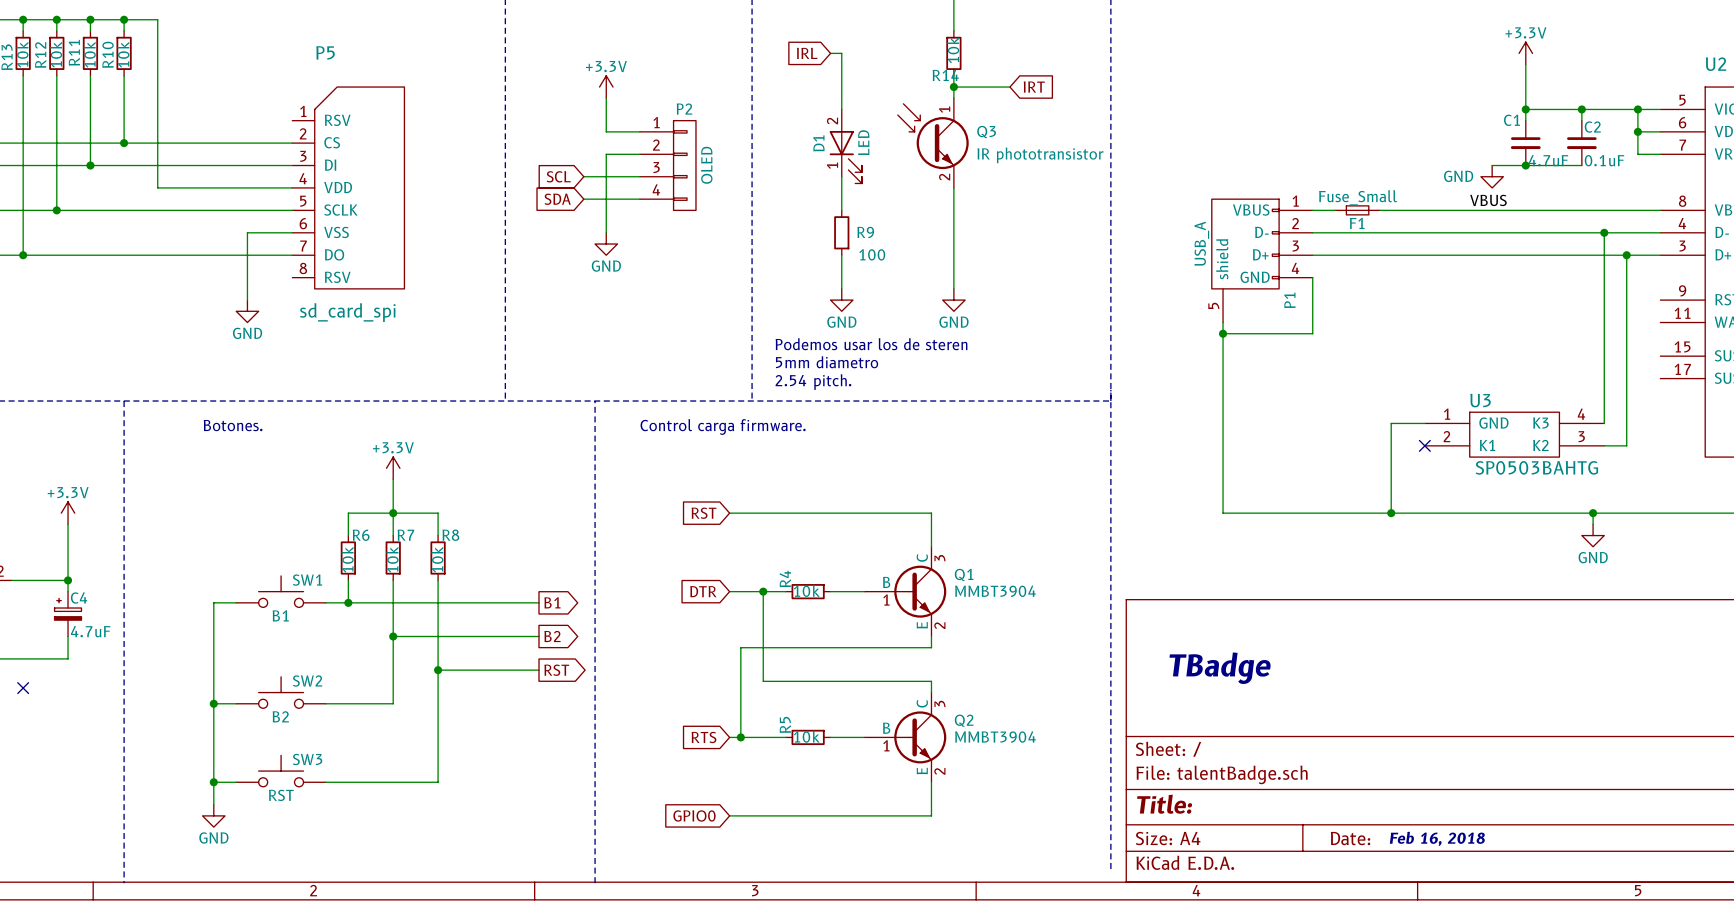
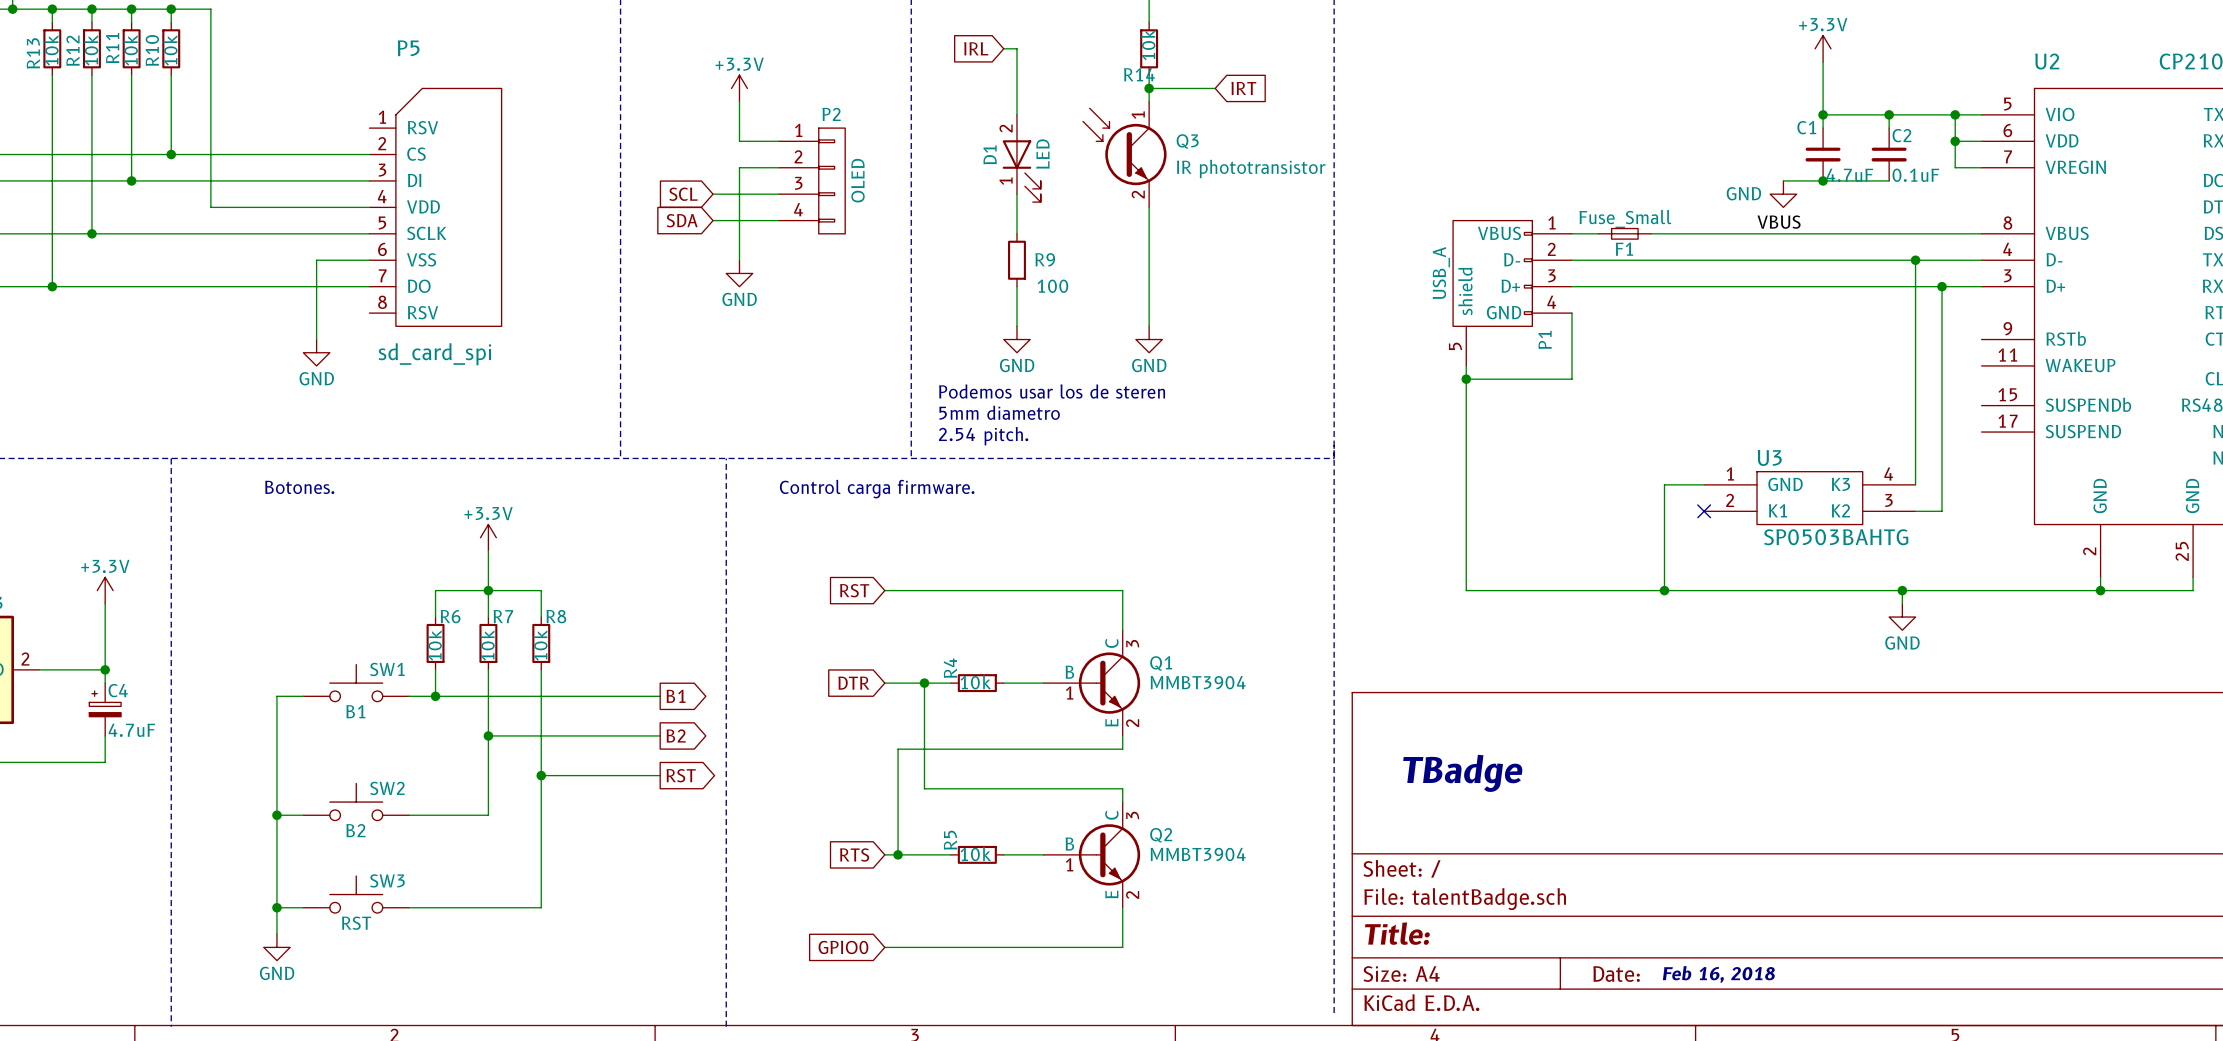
no-connect mark: (23, 688) -> none

